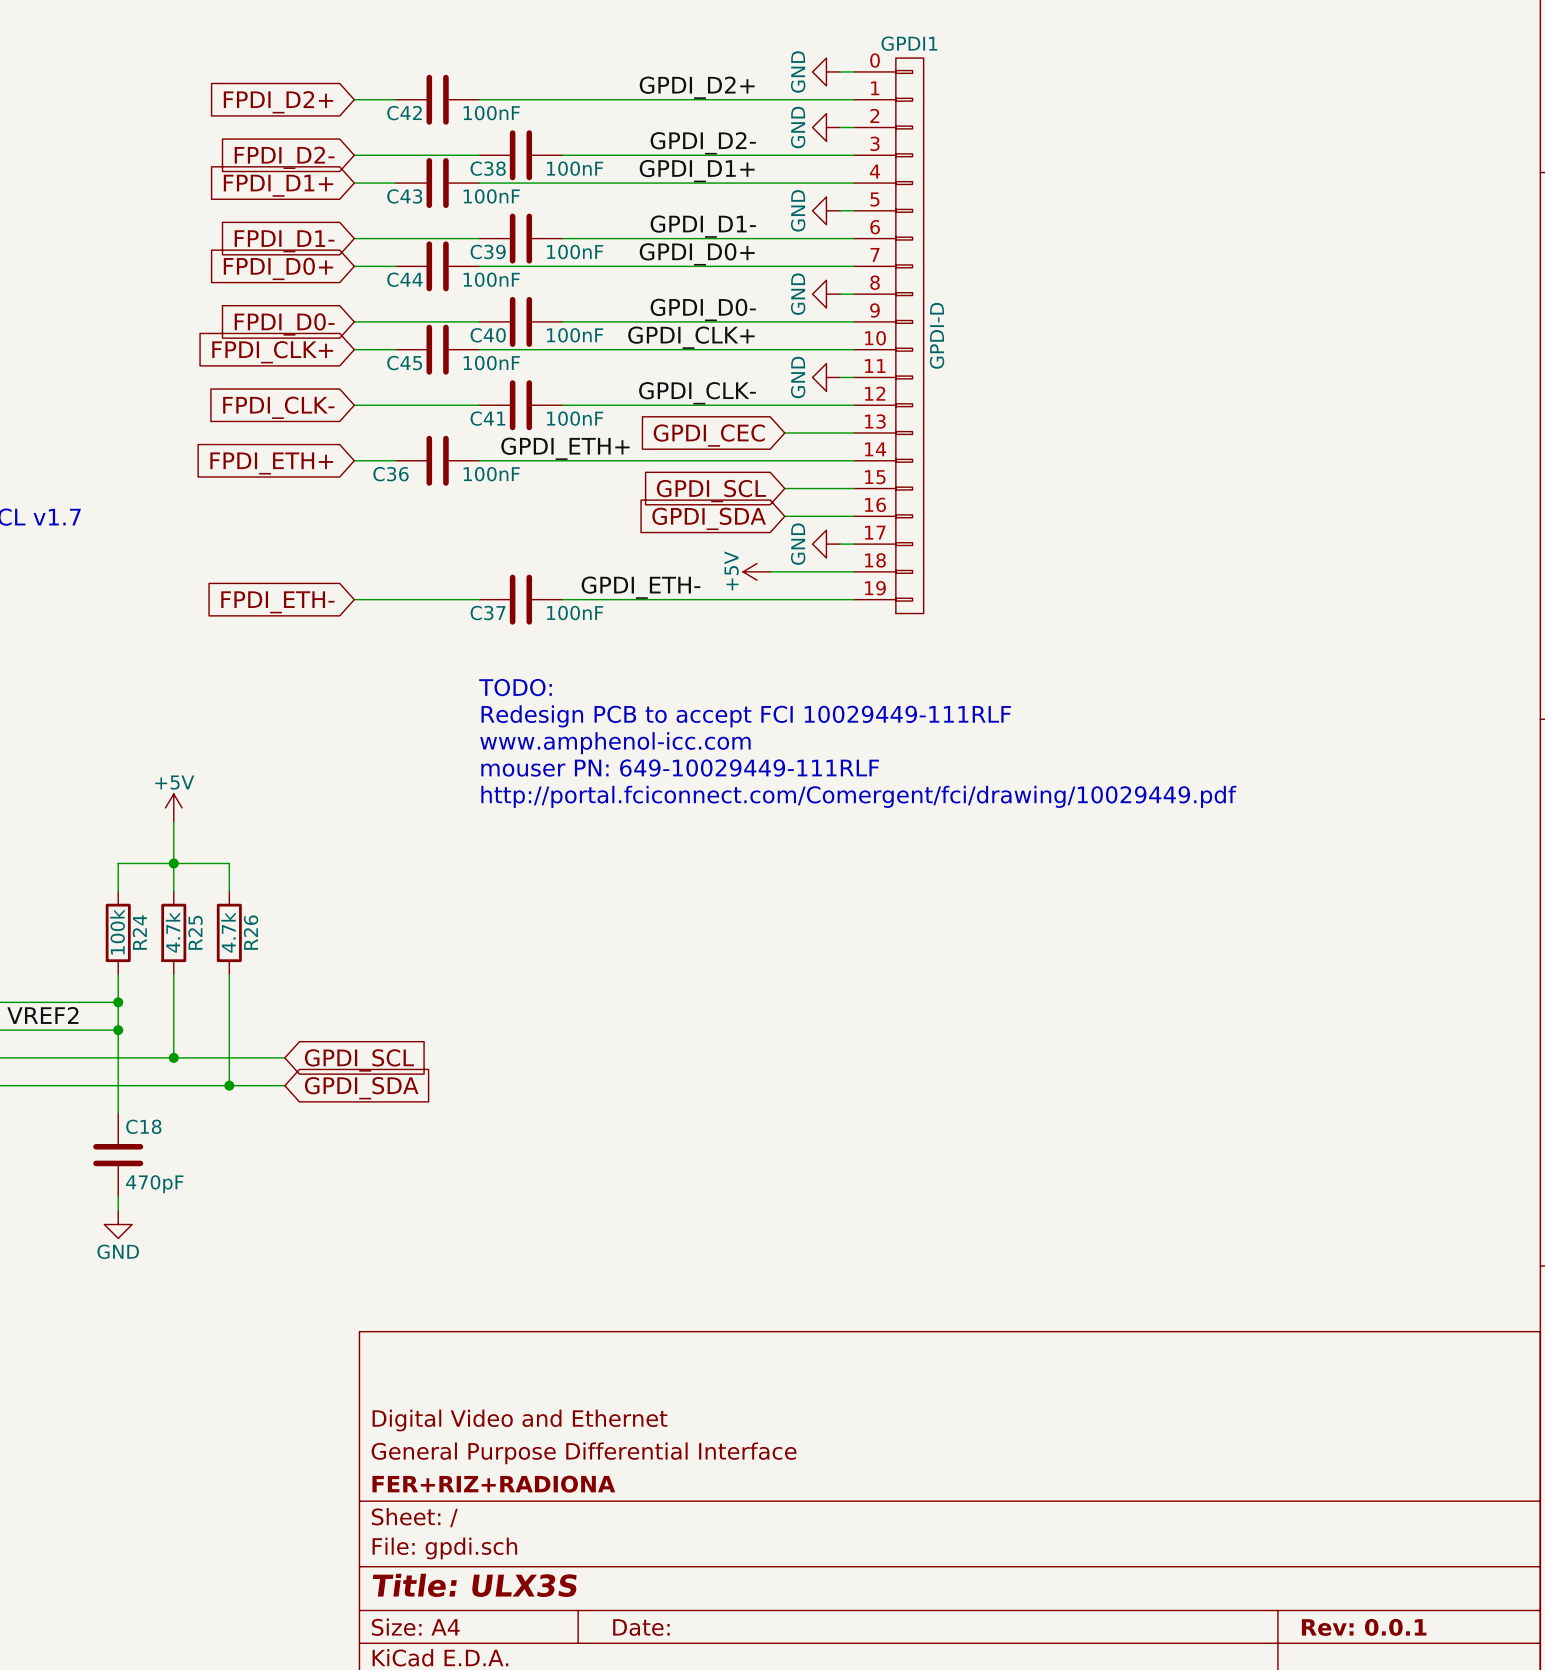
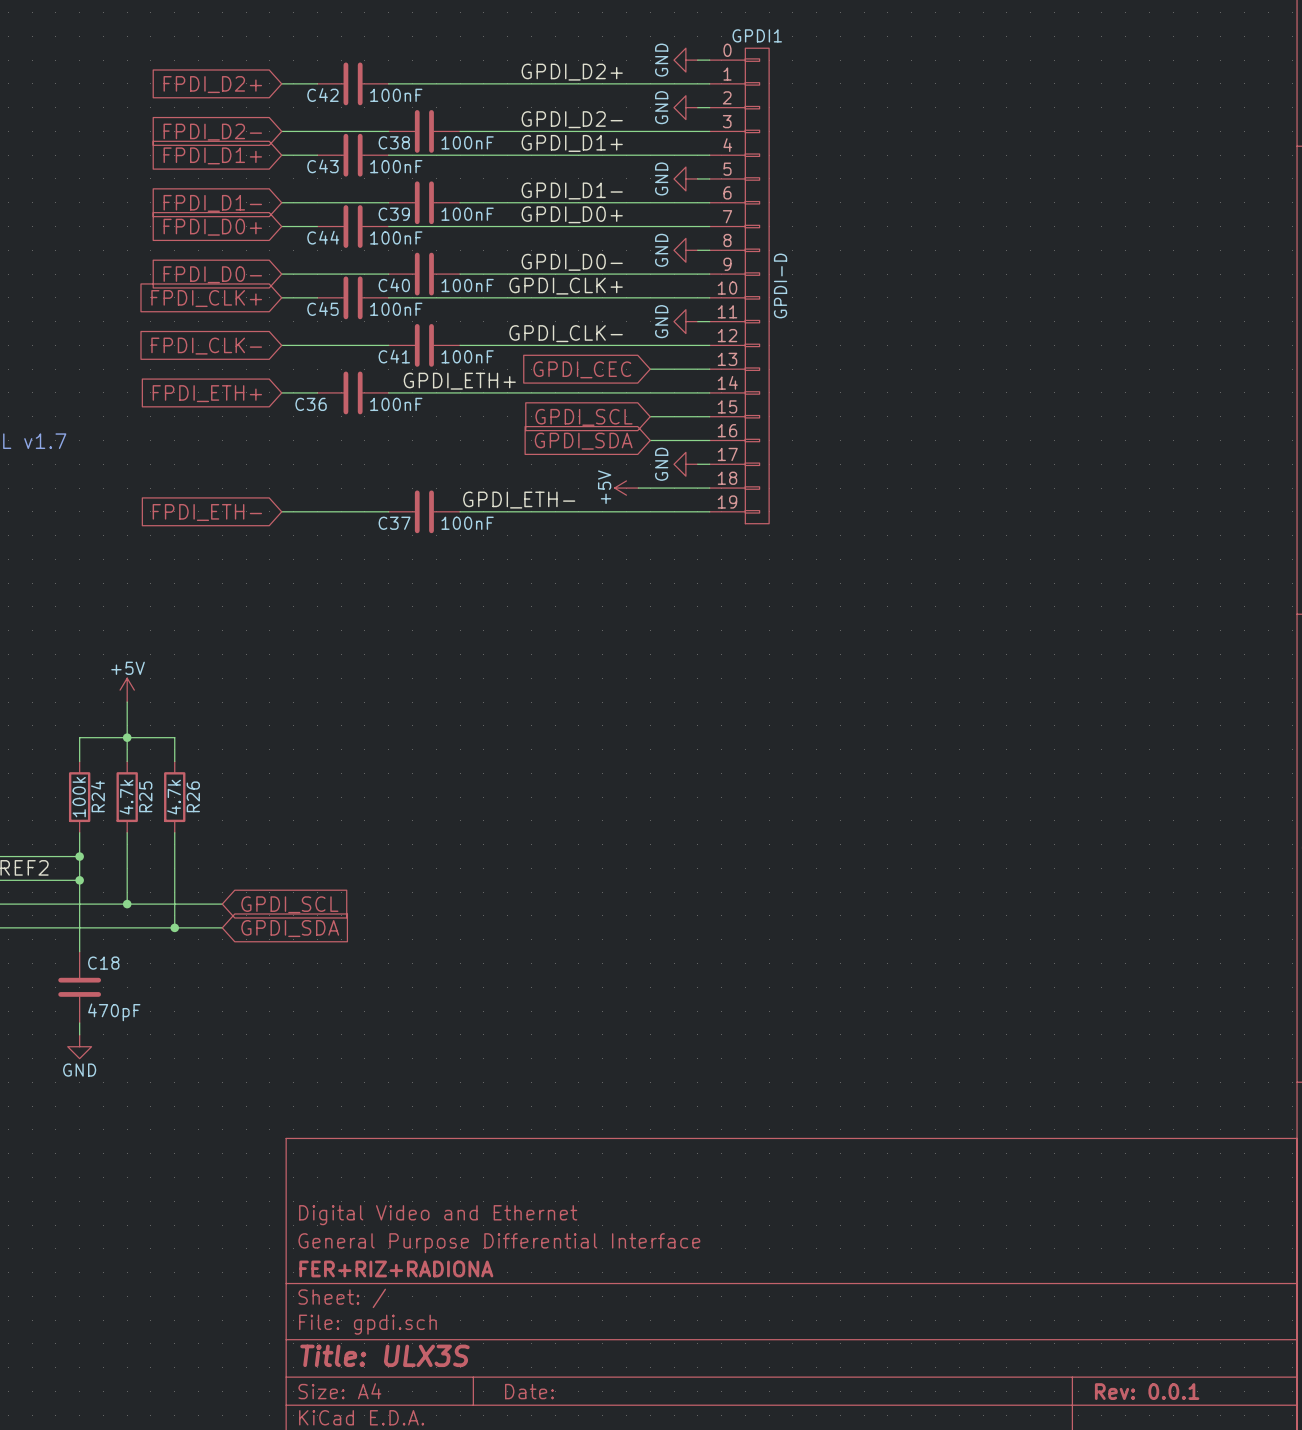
text: TODO: (515, 687) -> none
text: Redesign PCB to accept FCI 10029449-111RLF (746, 716) -> none
text: www.amphenol-icc.com (615, 743) -> none
text: mouser PN: 649-10029449-111RLF (680, 768) -> none
text: http://portal.fciconnect.com/Comergent/fci/drawing/10029449.pdf (858, 796) -> none

